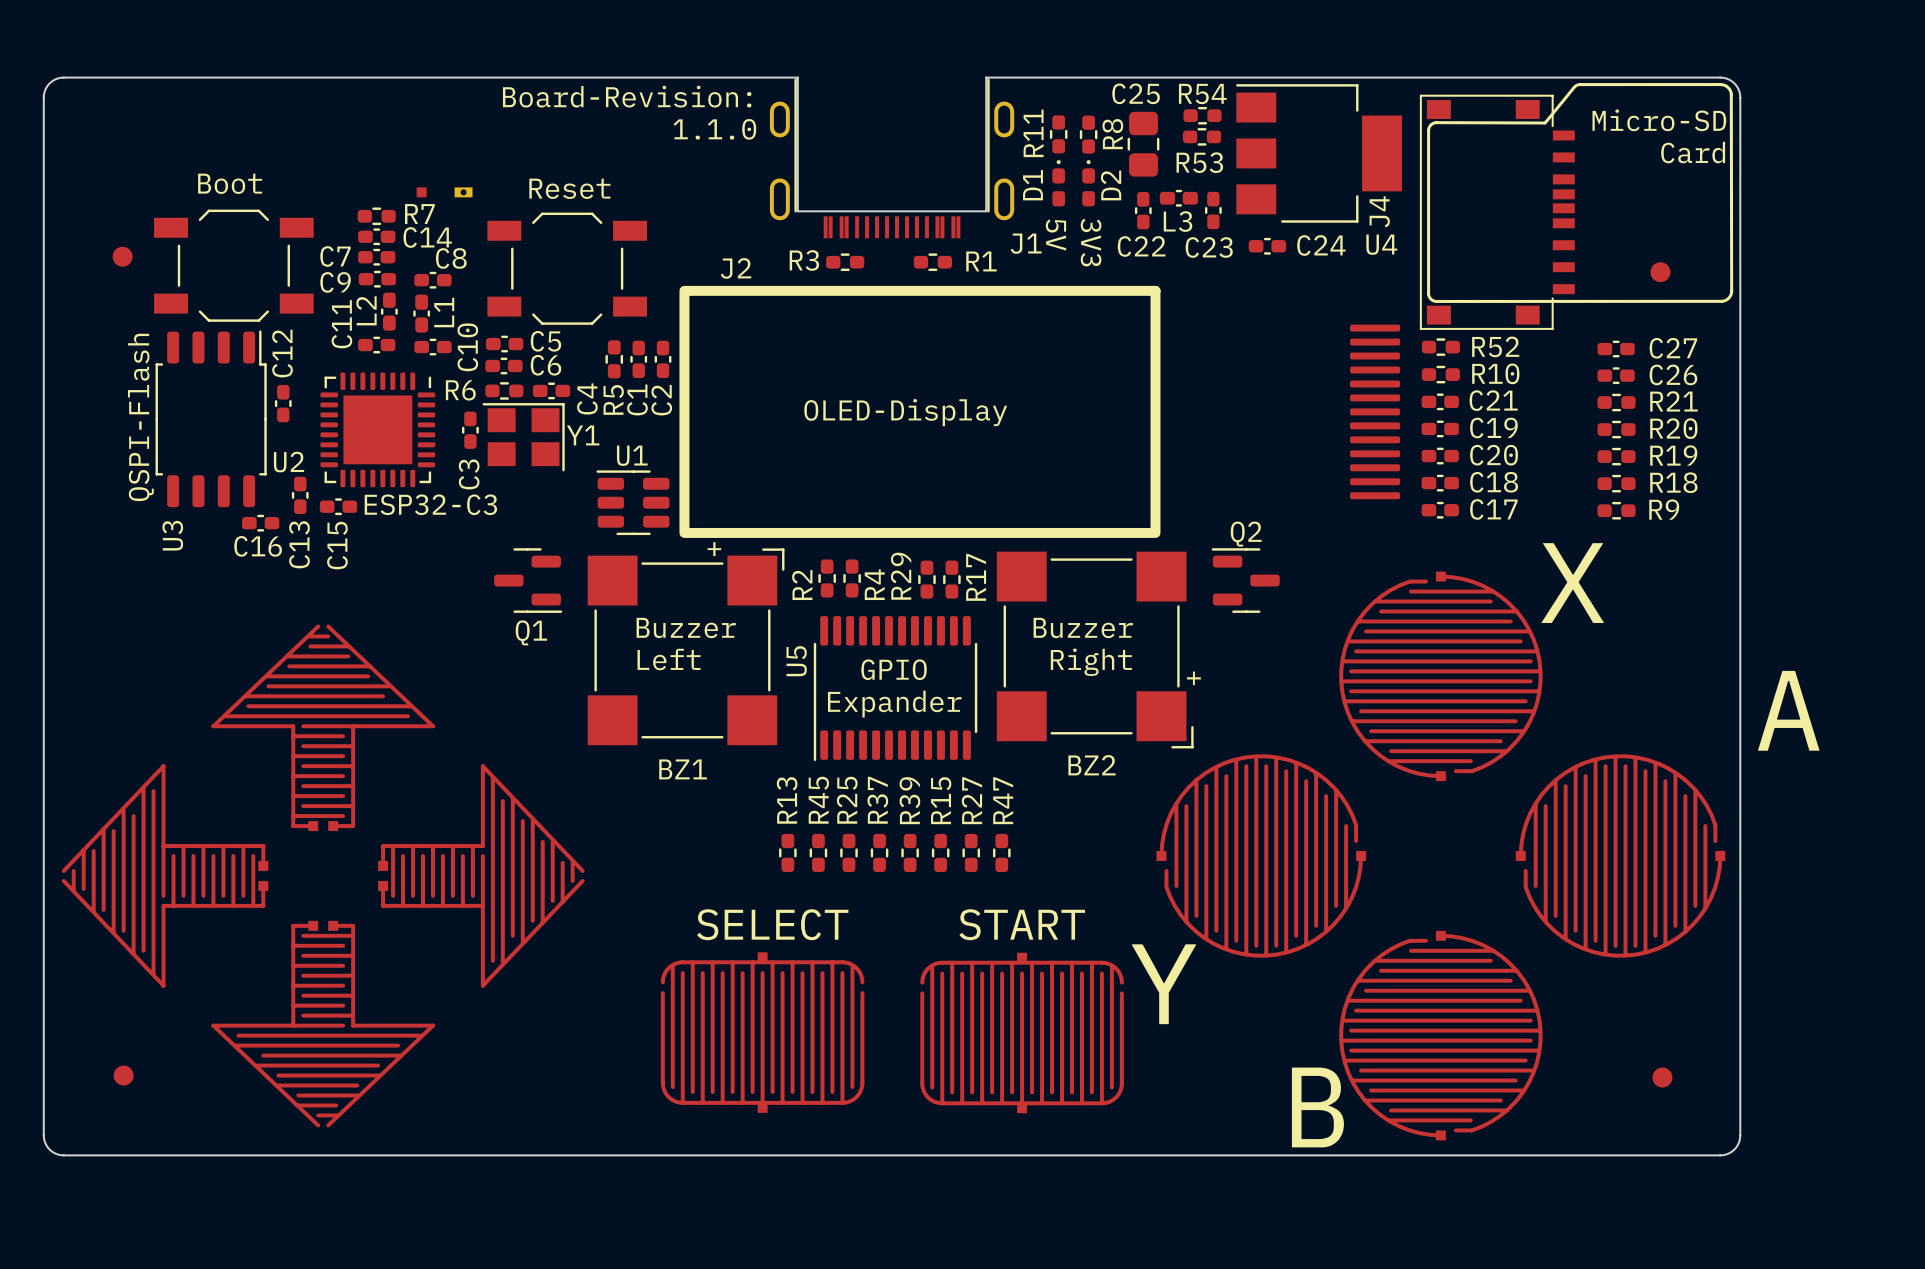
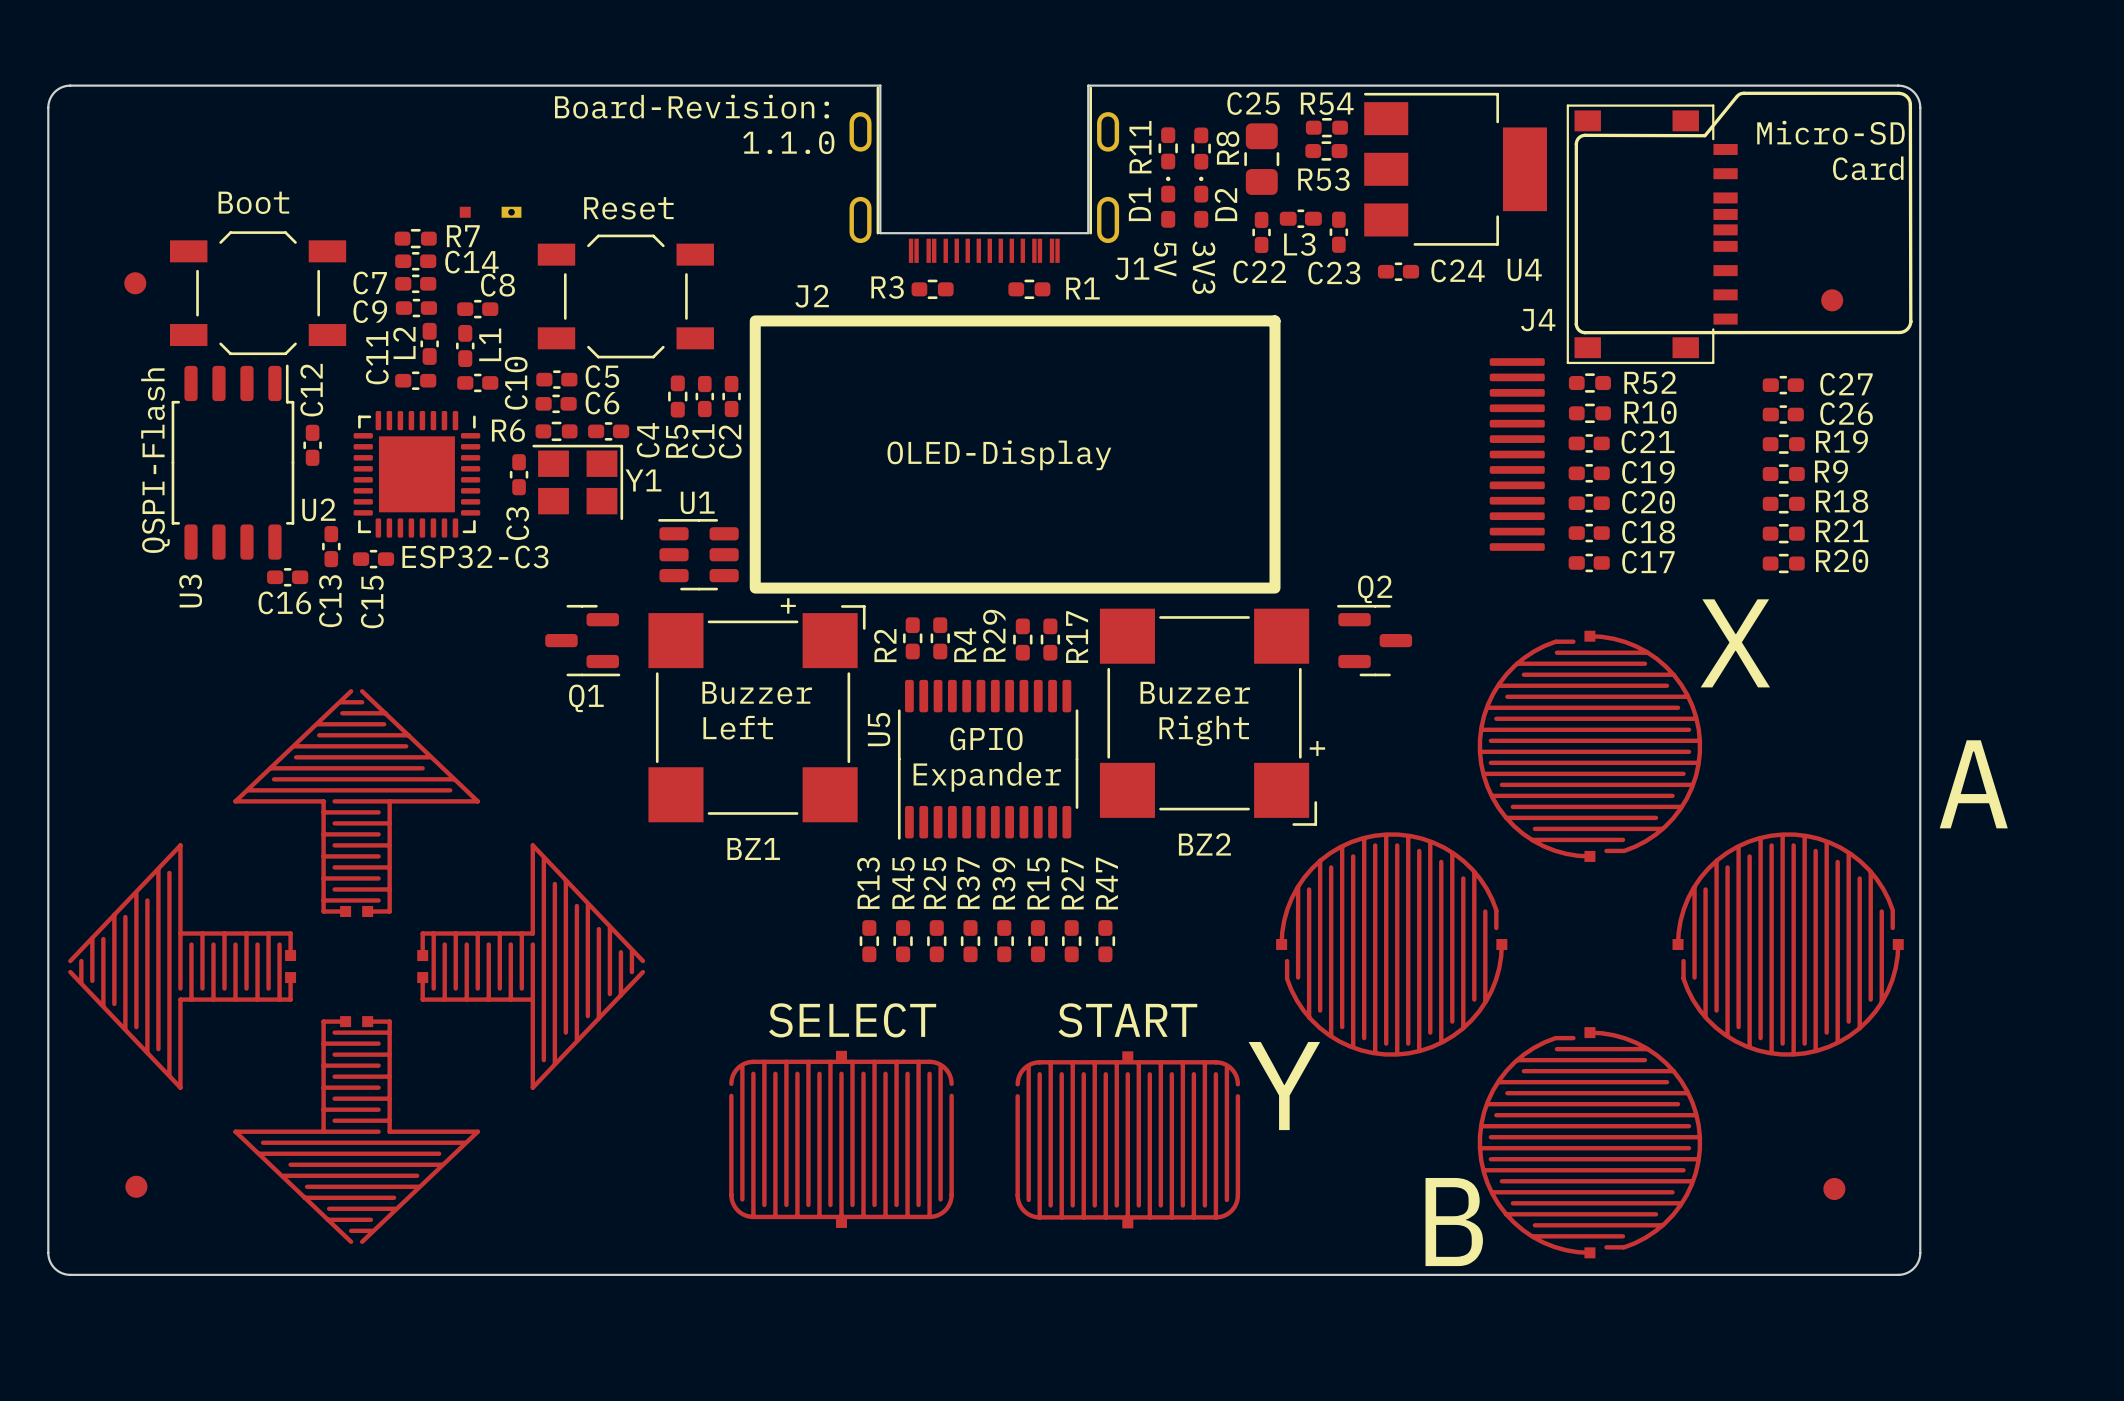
J4 name rotation: 0° (1379, 211) -> 90° clockwise (1538, 320)
J4 name position: J4 (1379, 211) -> J4 (1538, 320)
R21 name: R21 (1673, 401) -> R19 (1841, 441)
R20 name: R20 (1673, 428) -> R9 (1831, 471)
R19 name: R19 (1673, 455) -> R18 (1842, 501)
R18 name: R18 (1673, 482) -> R21 (1842, 531)
R9 name: R9 (1664, 509) -> R20 (1842, 561)

